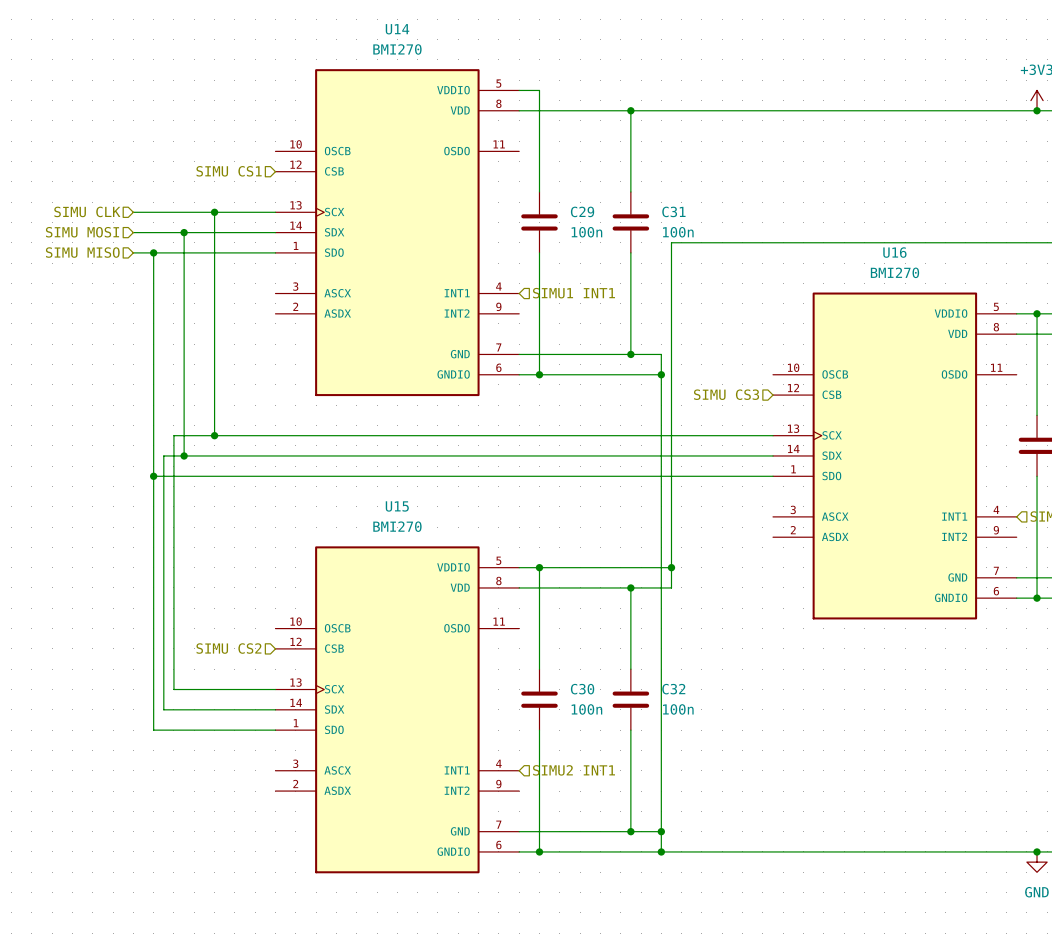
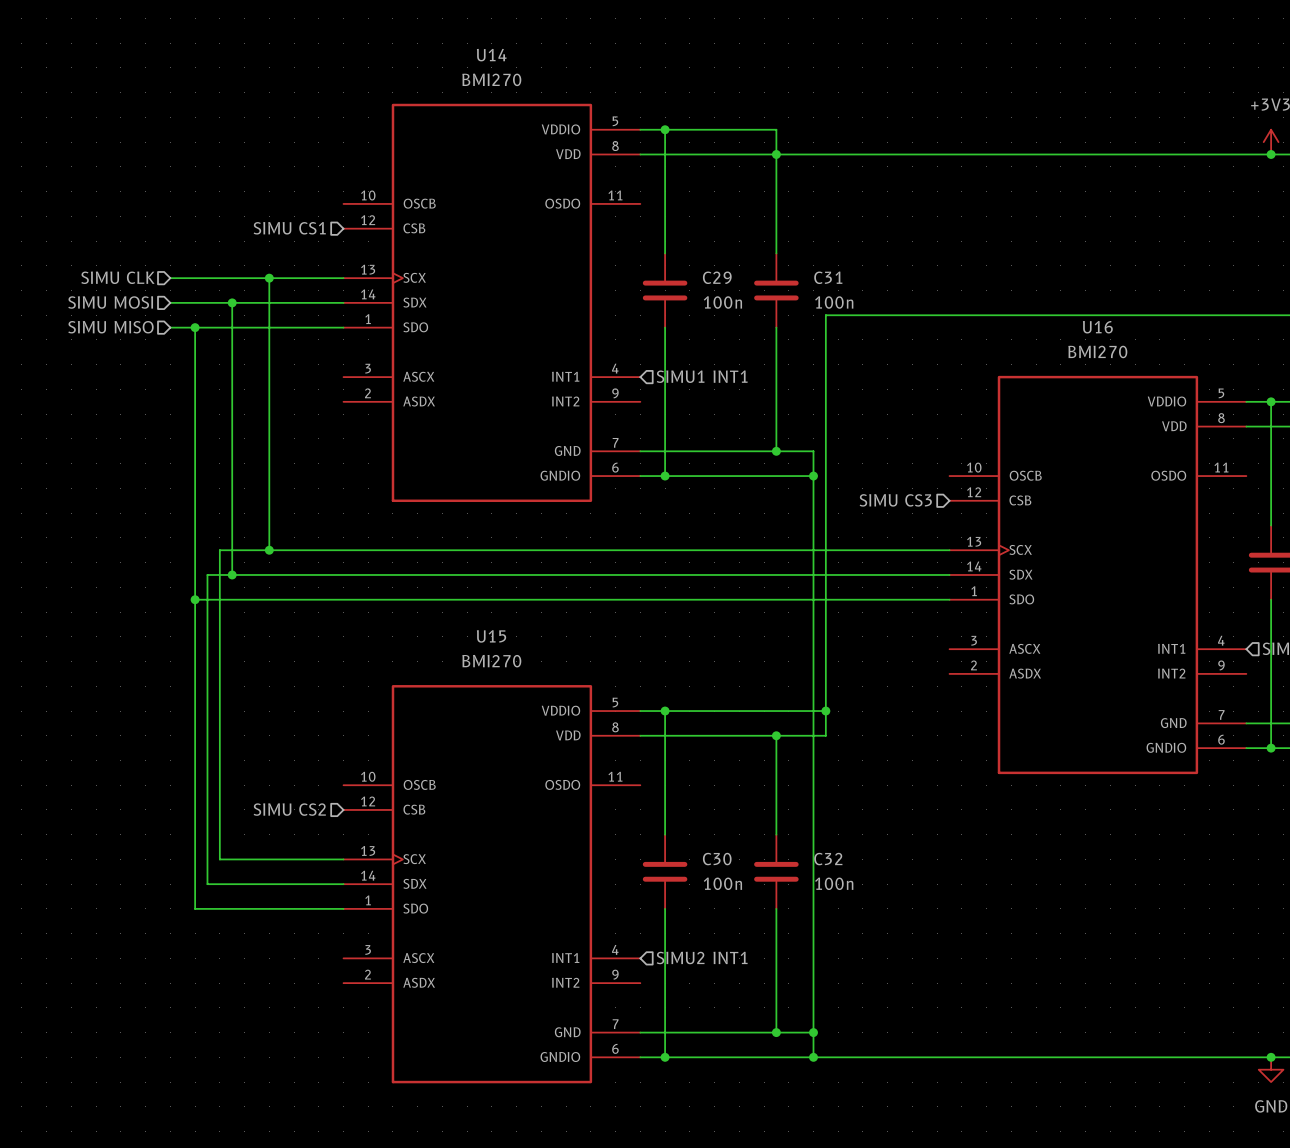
wire: none -> (665, 129) (776, 129) (776, 154)
junction: none -> (665, 129)

